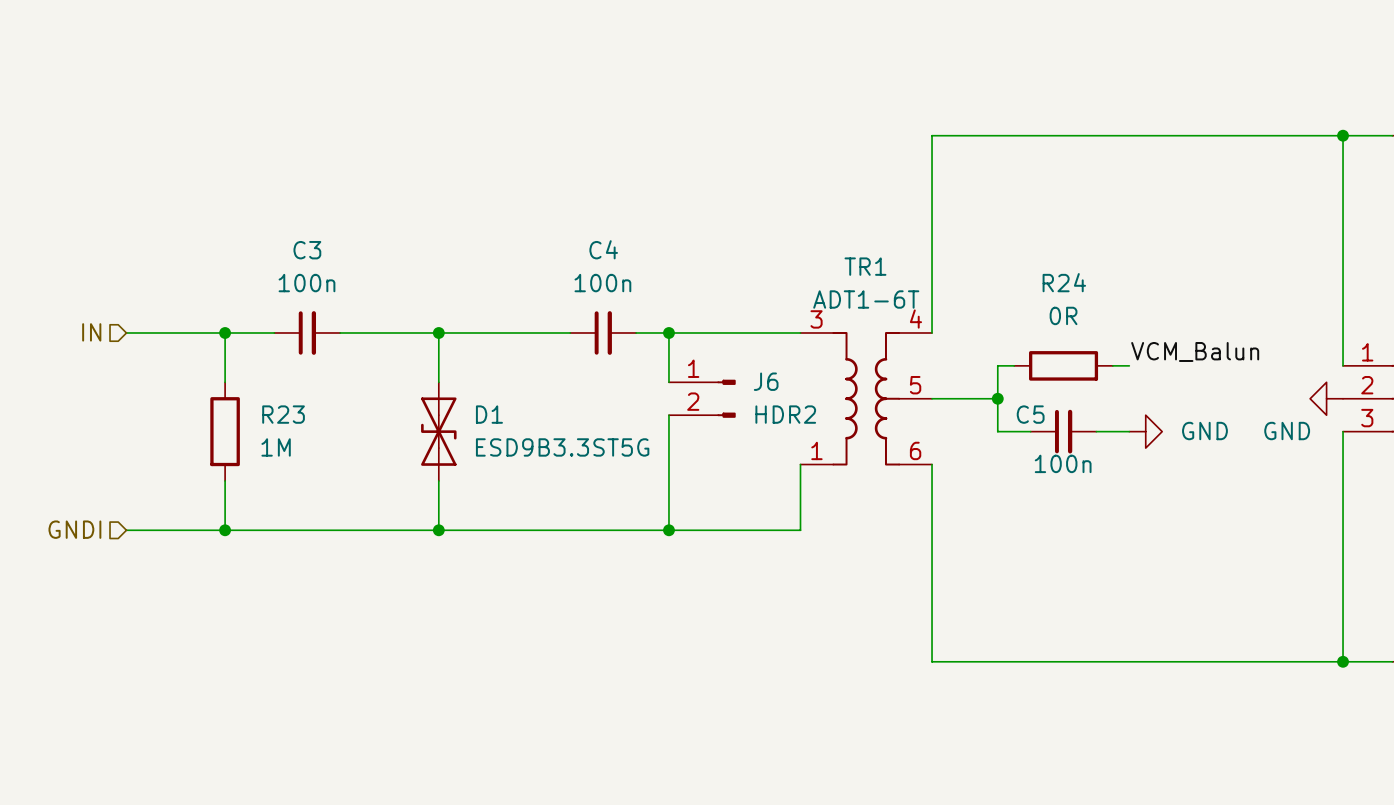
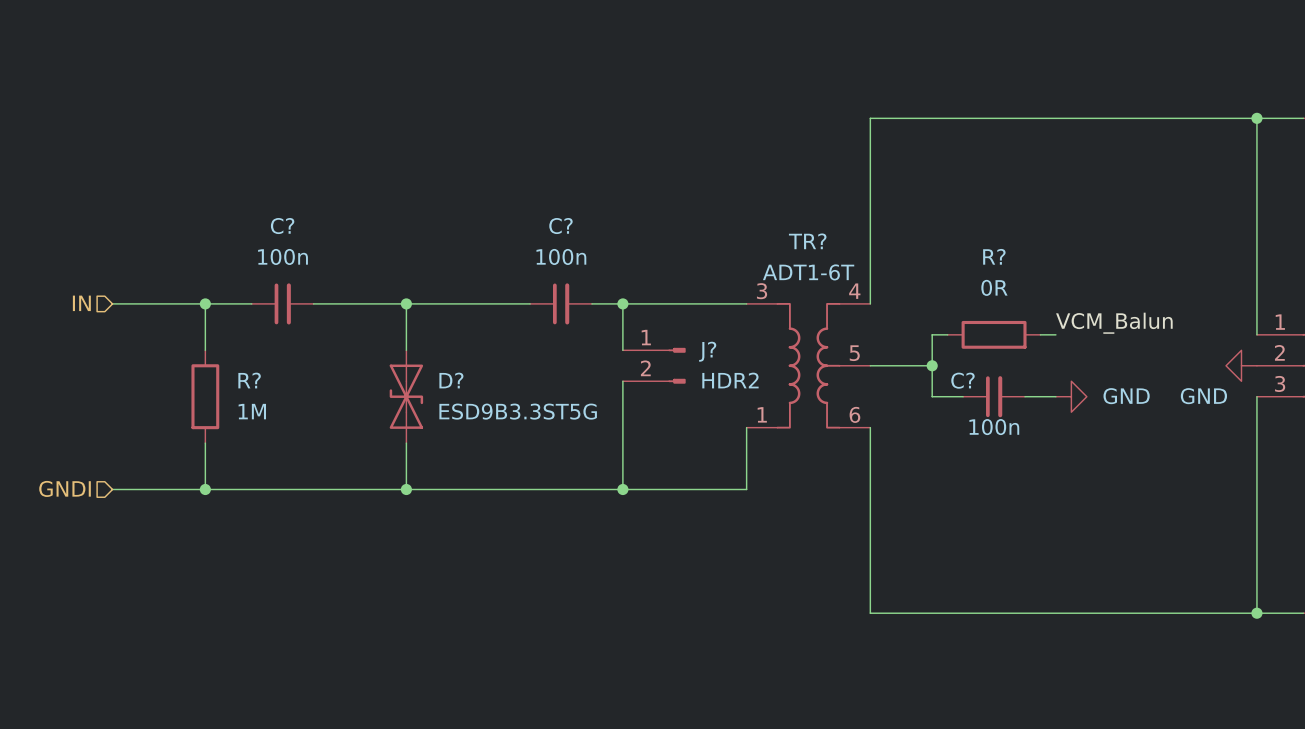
C4 name: C4 (603, 249) -> C? (560, 226)
C3 name: C3 (307, 250) -> C? (282, 226)
TR1 name: TR1 (865, 266) -> TR? (807, 241)
R24 name: R24 (1064, 282) -> R? (994, 256)
J6 name: J6 (766, 381) -> J? (707, 351)
R23 name: R23 (283, 414) -> R? (249, 380)
D1 name: D1 (489, 414) -> D? (451, 380)
C5 name: C5 (1030, 414) -> C? (962, 380)

